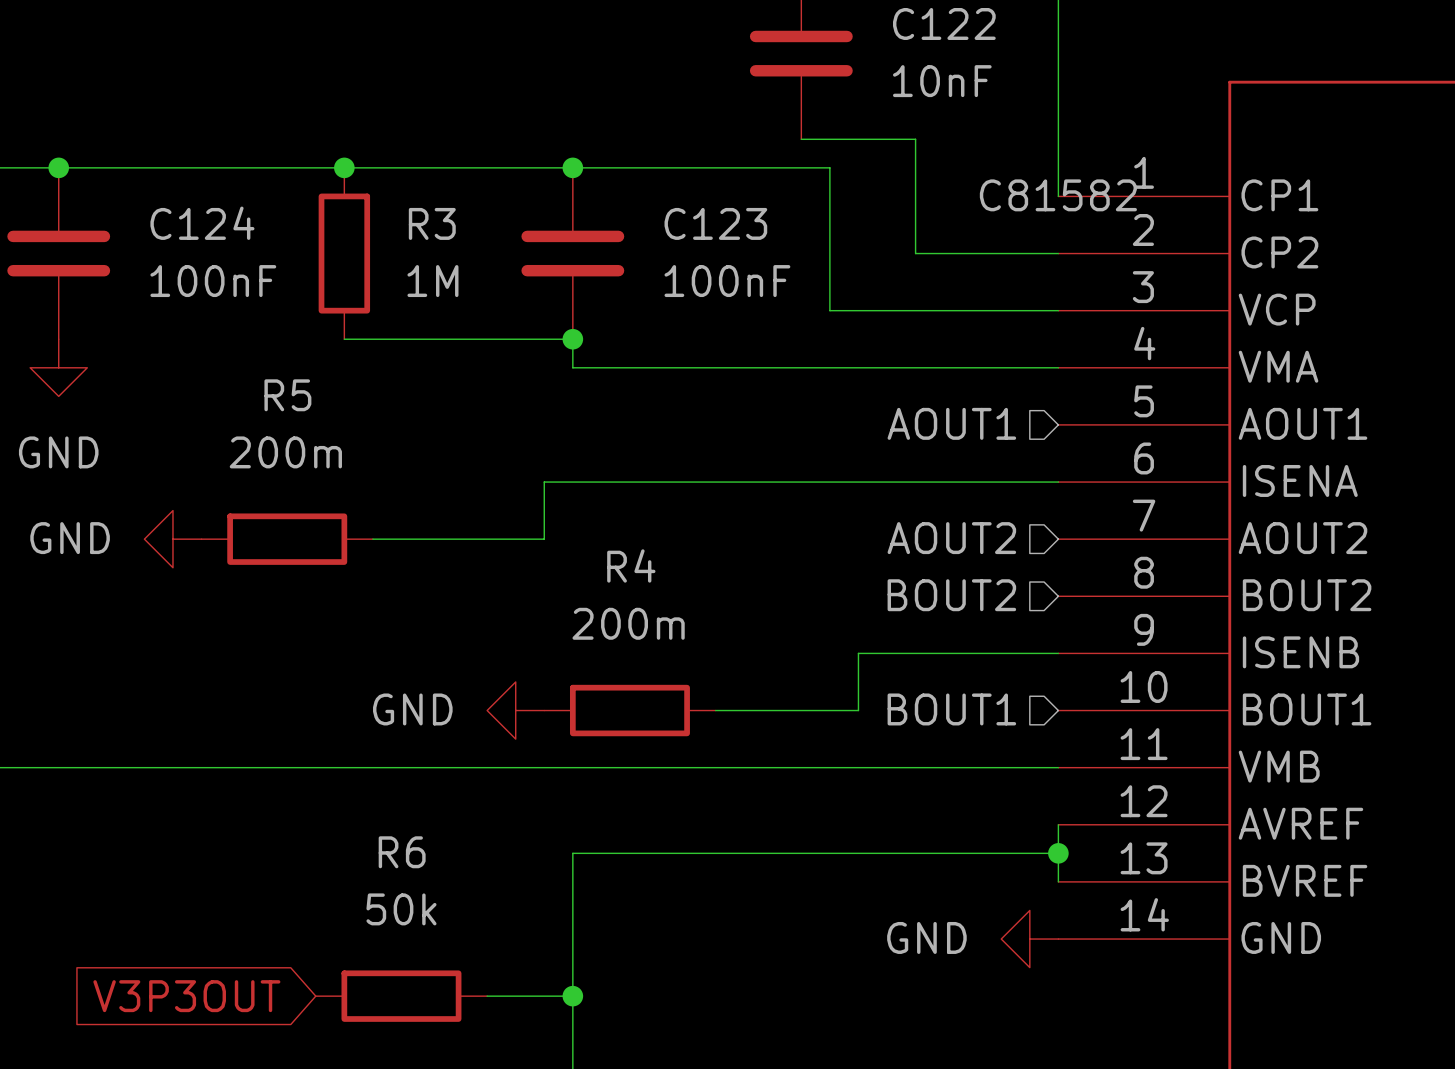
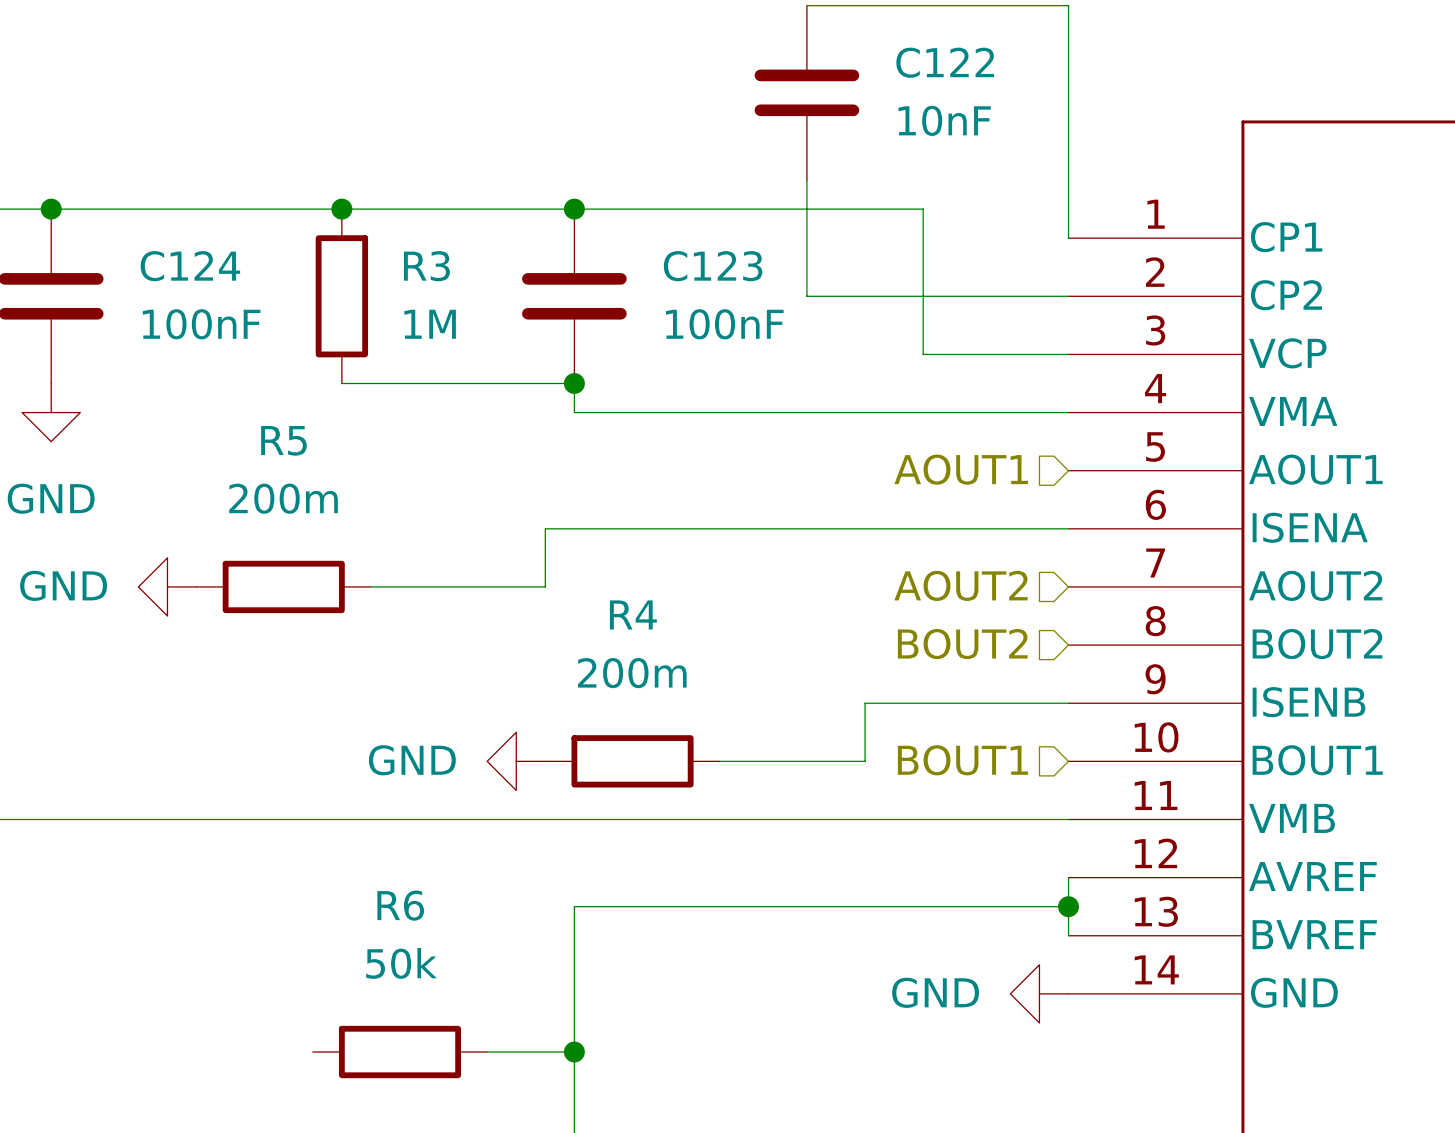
wire: (801, 139) (915, 139) (915, 167) -> (835, 209) (923, 209)
wire: (829, 167) (829, 310) (915, 310) -> (806, 180) (806, 296) (923, 296) (923, 354)
part text: C81582 (1058, 195) -> none
global label: V3P3OUT (186, 996) -> none

